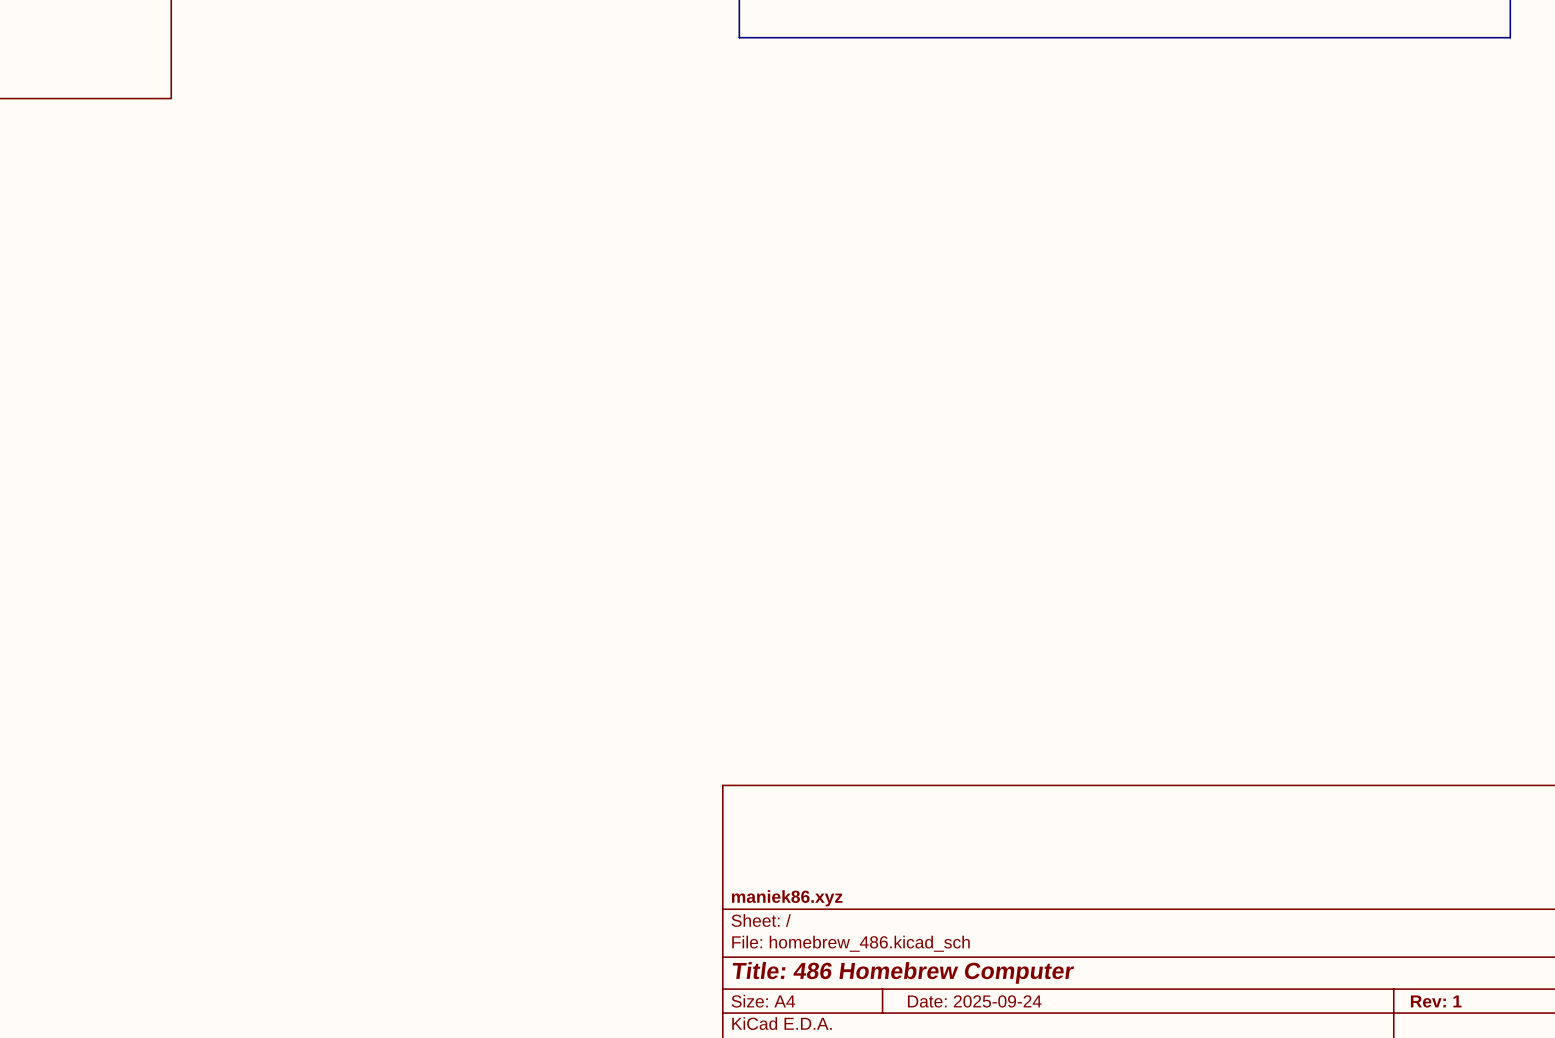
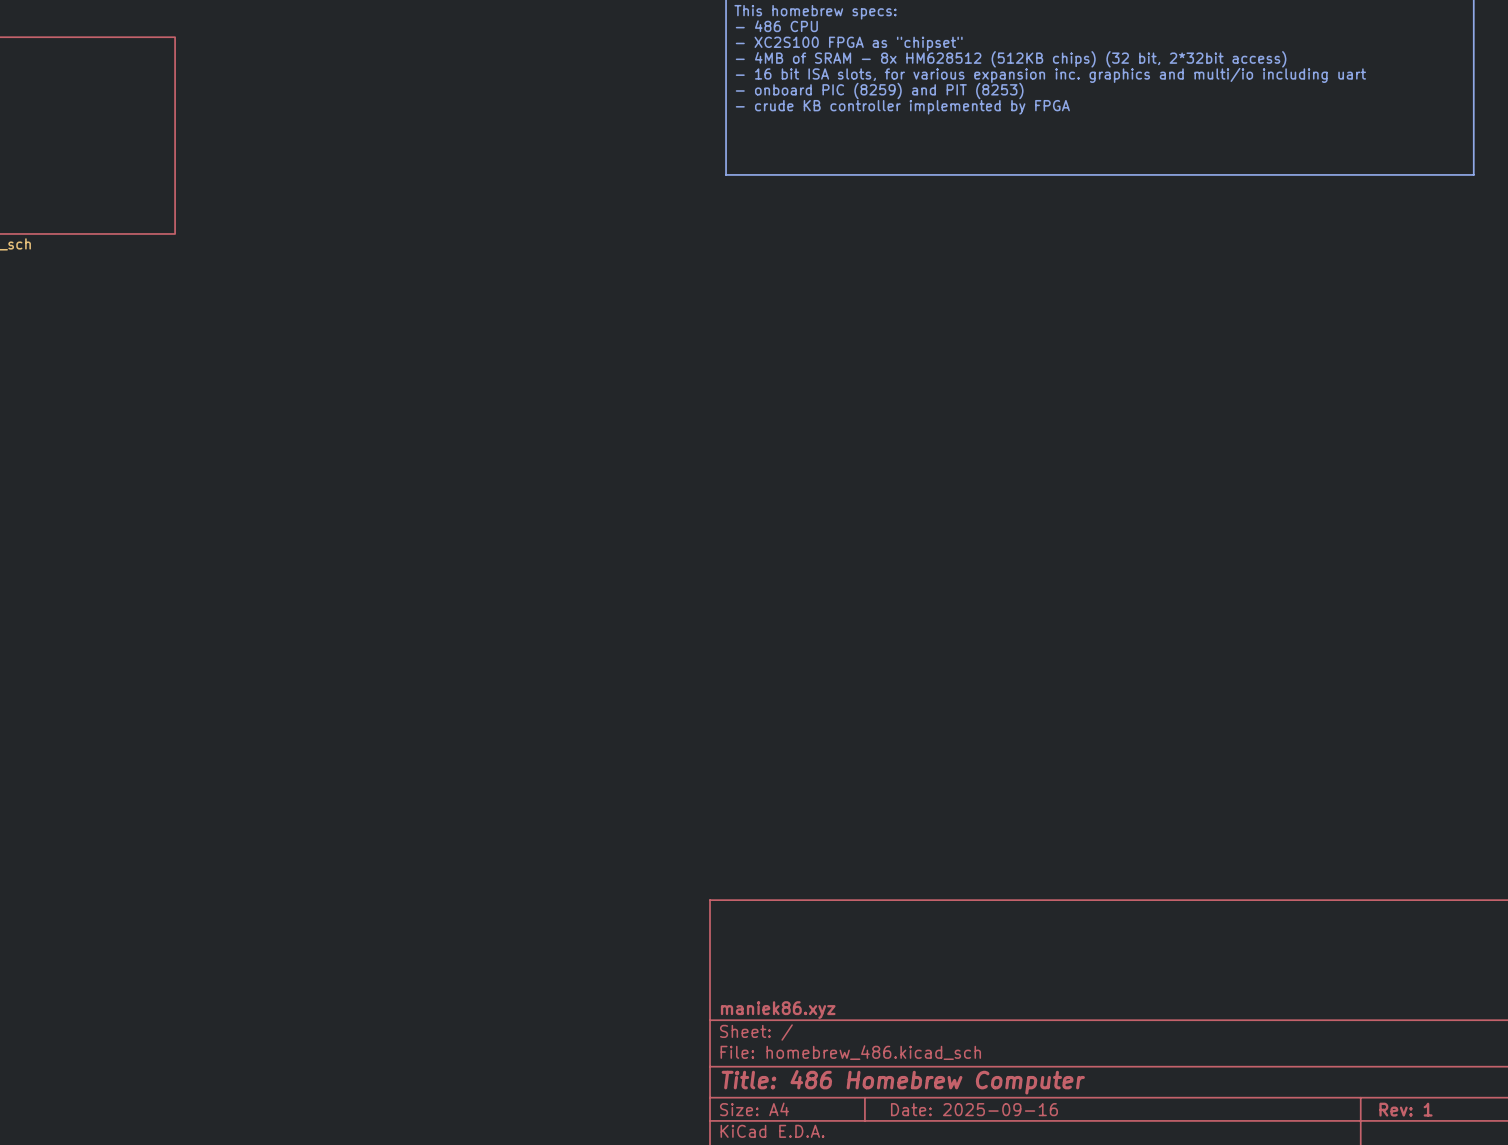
title block: Date: 2025-09-24 (974, 1001) -> Date: 2025-09-16 (974, 1109)

